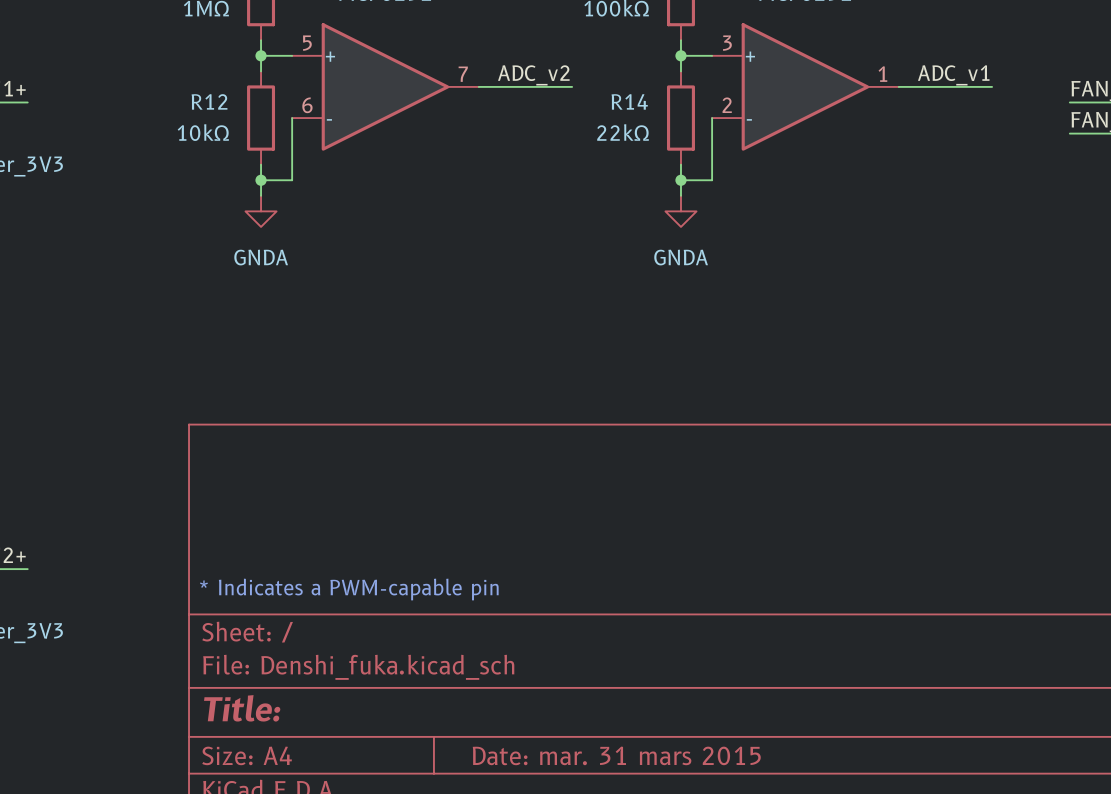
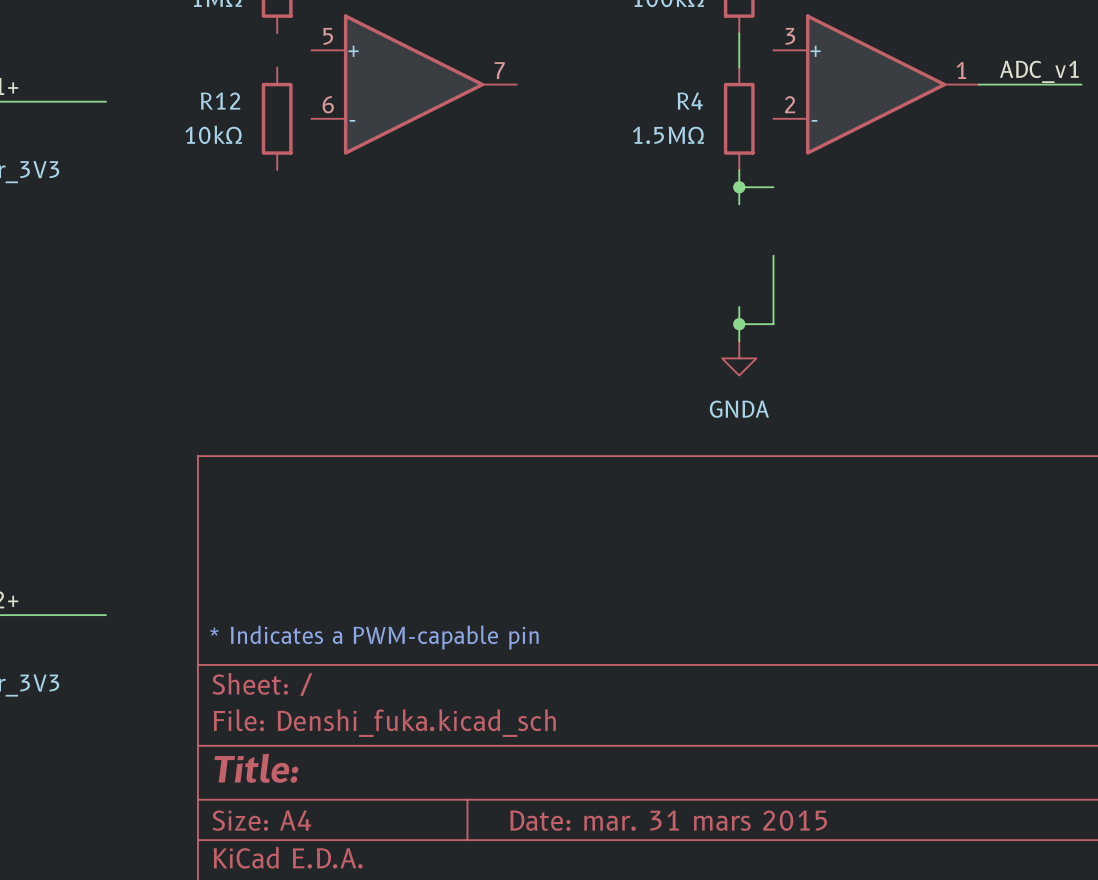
wire: (261, 40) (261, 71) -> none
wire: (261, 55) (292, 55) -> none
junction: (261, 55) -> none
wire: (680, 55) (712, 55) -> none
junction: (680, 55) -> none
label: ADC_v2 (533, 75) -> none
wire: (478, 86) (572, 86) -> none
R14 name: R14 (629, 101) -> R4 (690, 101)
wire: none -> (20, 101) (106, 101)
wire: (292, 118) (292, 180) (261, 180) -> none
wire: (712, 118) (712, 180) -> none
R14 value: 22kΩ (623, 132) -> 1.5MΩ (668, 135)
wire: (261, 164) (261, 195) -> none
junction: (261, 180) -> none
power symbol: GNDA (261, 211) -> none
power symbol position: GNDA (680, 211) -> GNDA (739, 358)
wire: none -> (773, 255) (773, 324) (739, 324)
wire: none -> (739, 307) (739, 341)
junction: none -> (739, 324)
wire: none -> (20, 615) (106, 615)

